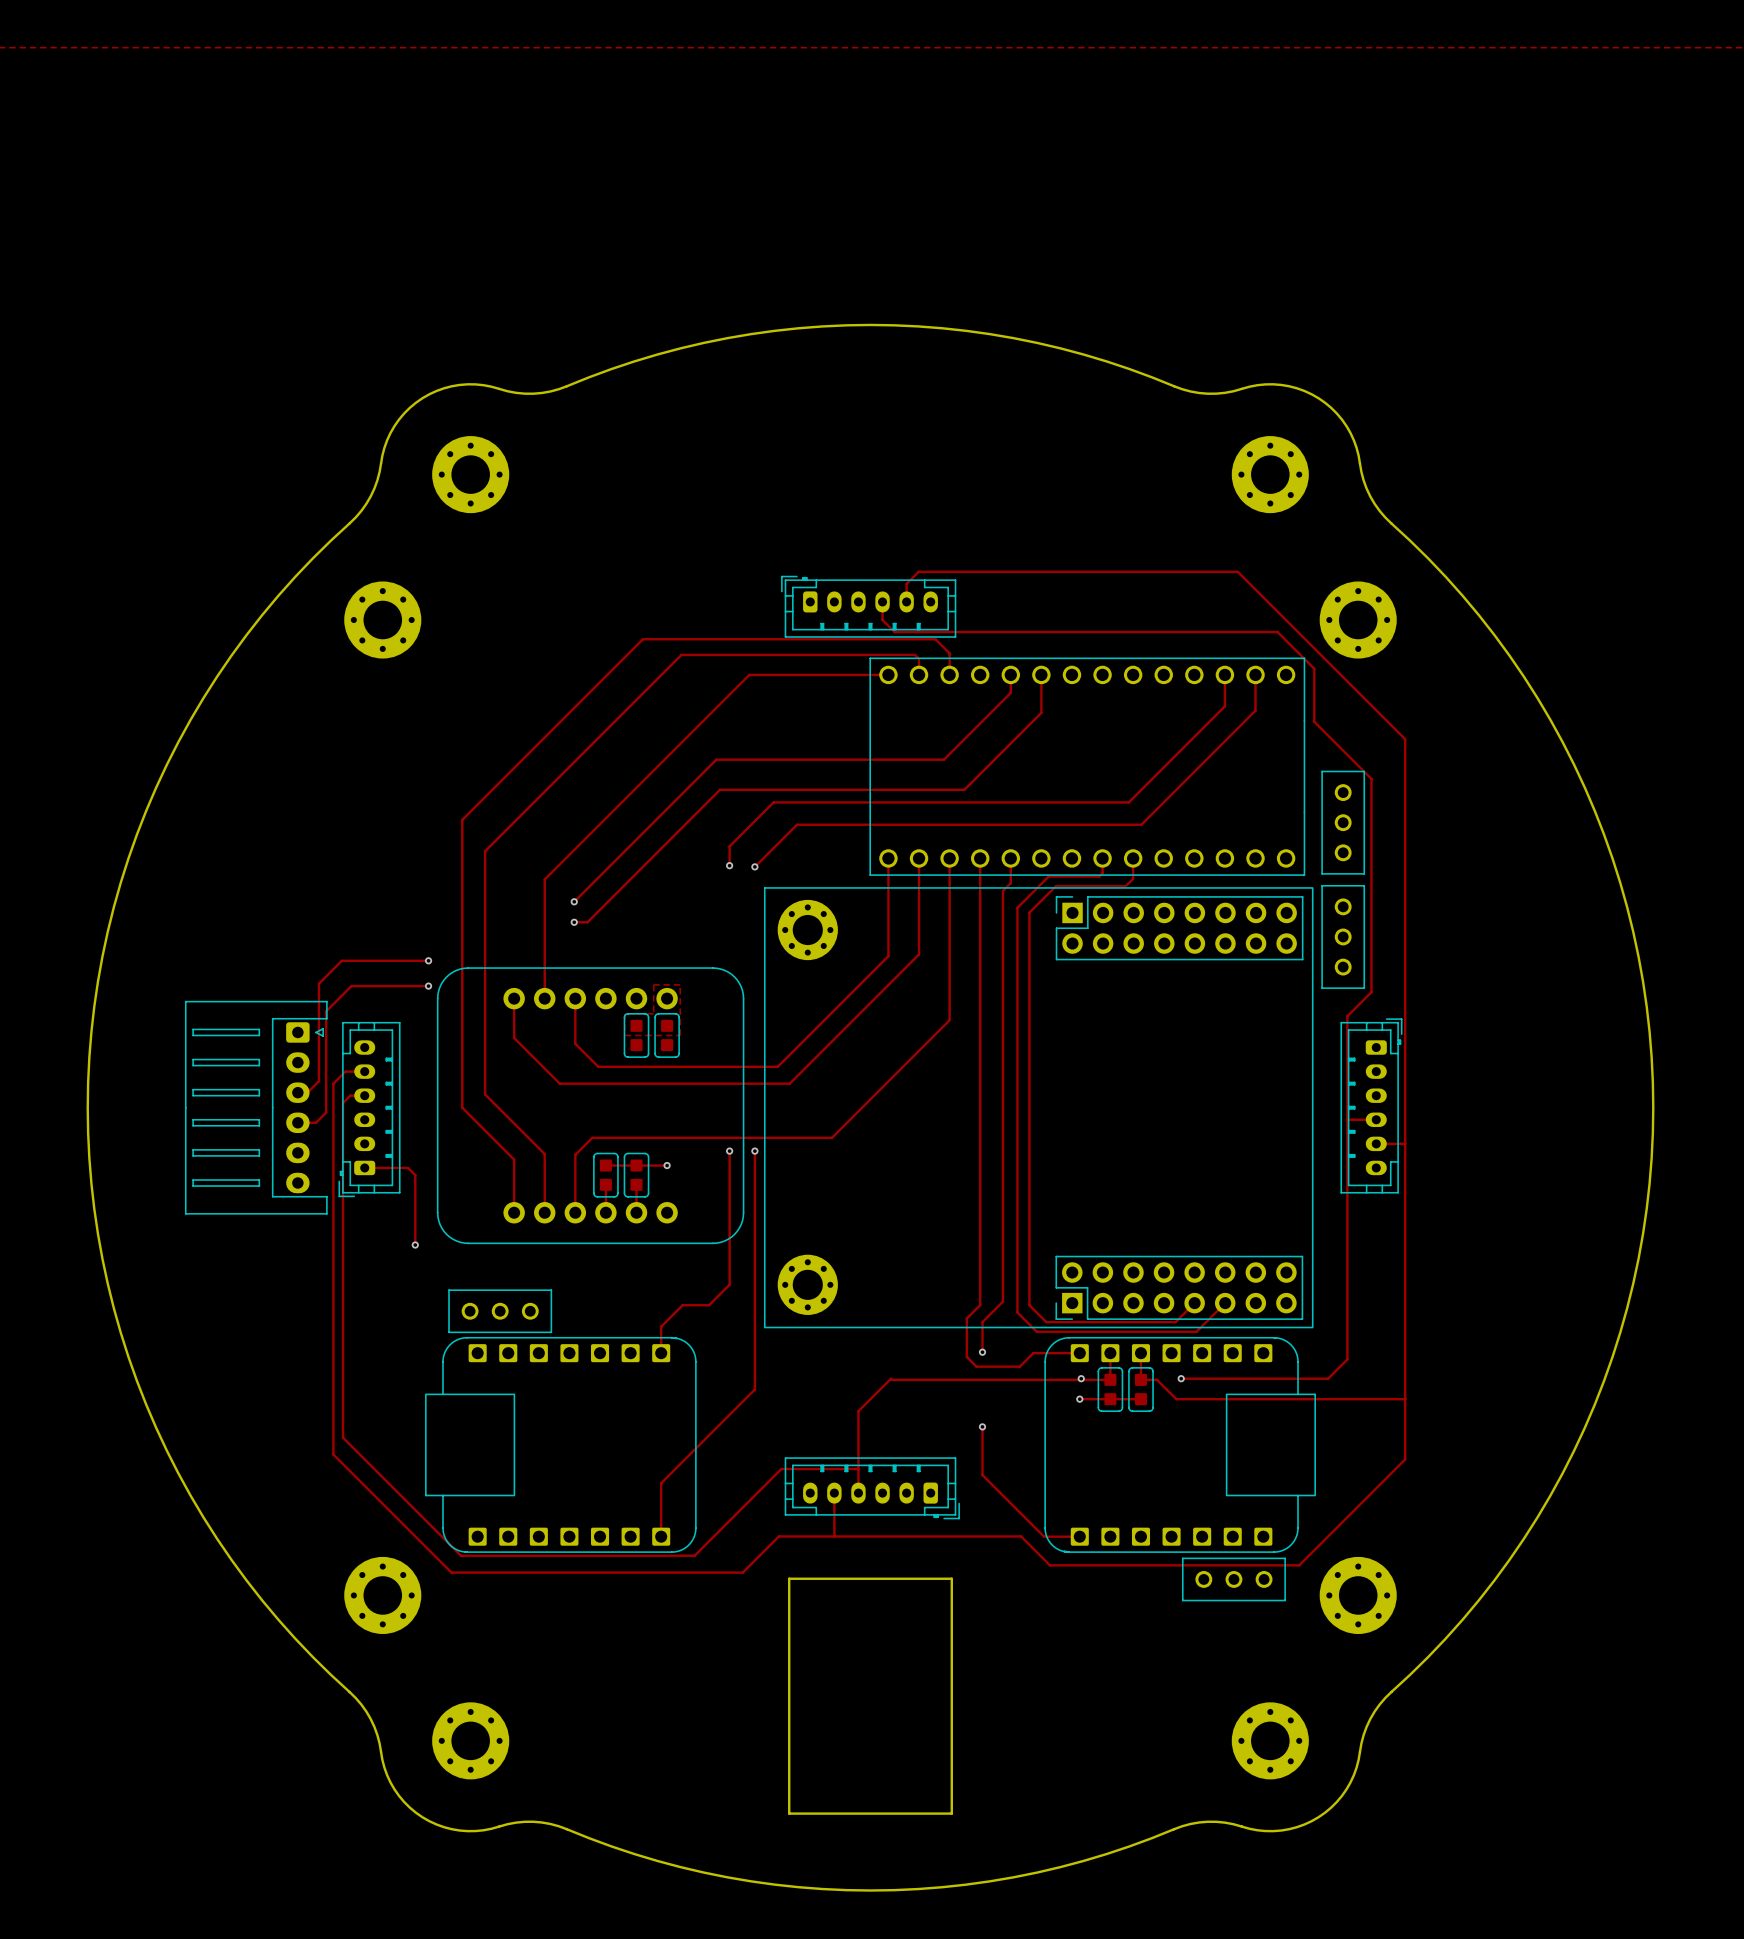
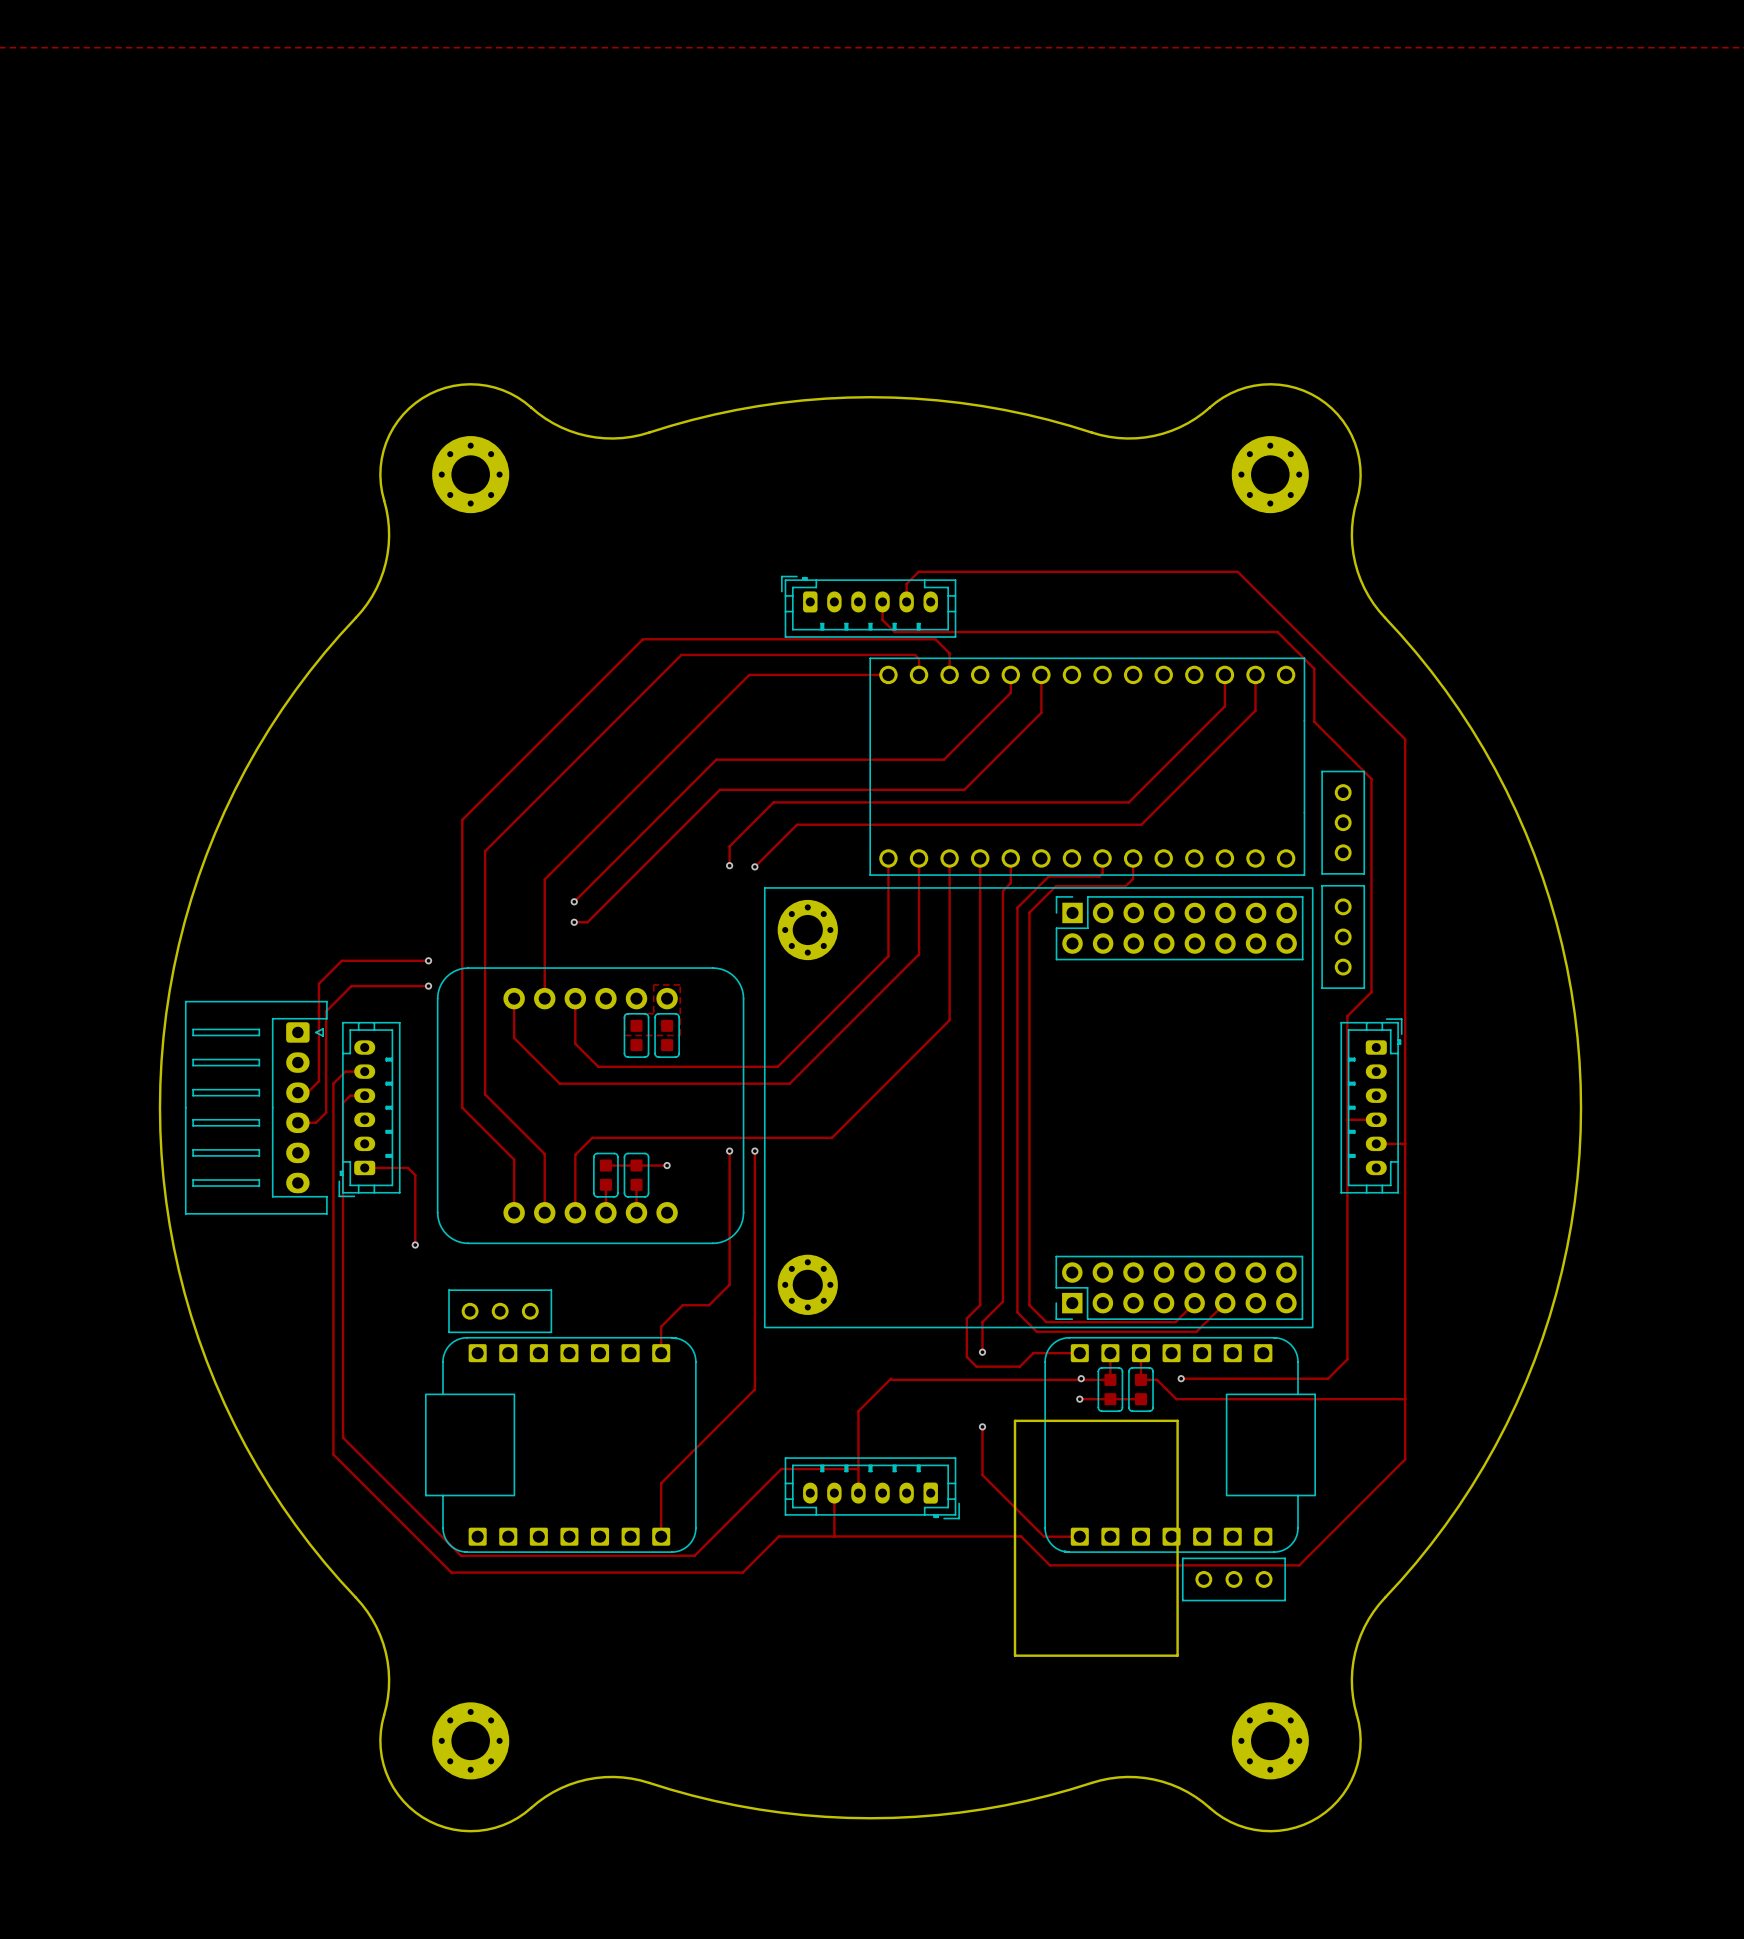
board edge: (566, 386) (550, 391) (533, 393) (515, 392) (475, 384) (451, 386) (429, 394) (404, 413) (387, 440) (377, 480) (366, 503) (355, 517) (312, 558) (278, 595) (246, 635) (203, 697) (166, 764) (136, 834) (120, 882) (107, 931) (94, 1006) (88, 1082) (89, 1158) (97, 1234) (113, 1308) (136, 1380) (156, 1427) (178, 1473) (217, 1538) (262, 1600) (295, 1638) (355, 1698) (366, 1711) (377, 1735) (387, 1775) (399, 1795) (415, 1812) (444, 1827) (475, 1831) (515, 1822) (541, 1822) (558, 1826) (634, 1854) (703, 1872) (798, 1887) (870, 1890) (966, 1884) (1037, 1872) (1106, 1854) (1182, 1826) (1199, 1822) (1225, 1822) (1257, 1830) (1273, 1831) (1289, 1829) (1311, 1821) (1331, 1807) (1346, 1789) (1356, 1767) (1366, 1726) (1379, 1704) (1462, 1619) (1494, 1580) (1537, 1517) (1574, 1450) (1594, 1404) (1620, 1332) (1633, 1283) (1646, 1208) (1652, 1133) (1652, 1082) (1646, 1006) (1633, 931) (1612, 858) (1594, 810) (1562, 742) (1523, 676) (1478, 615) (1445, 576) (1385, 517) (1374, 503) (1363, 480) (1353, 440) (1342, 419) (1325, 402) (1304, 390) (1281, 384) (1265, 384) (1225, 392) (1199, 392) (1182, 389) (1106, 361) (1037, 342) (942, 328) (870, 324) (798, 328) (703, 342) (634, 361) (566, 386) -> (531, 407) (510, 393) (494, 387) (470, 384) (453, 385) (429, 394) (415, 403) (403, 414) (393, 427) (386, 442) (380, 467) (380, 483) (387, 518) (389, 536) (385, 562) (380, 580) (361, 611) (324, 652) (282, 709) (245, 769) (224, 811) (206, 854) (184, 921) (173, 967) (163, 1037) (159, 1107) (163, 1178) (173, 1247) (191, 1316) (215, 1382) (234, 1425) (257, 1466) (295, 1525) (324, 1562) (361, 1604) (380, 1635) (385, 1652) (389, 1679) (387, 1697) (380, 1731) (380, 1748) (386, 1772) (393, 1787) (409, 1807) (429, 1821) (445, 1827) (470, 1831) (494, 1827) (510, 1821) (545, 1796) (569, 1784) (586, 1779) (613, 1776) (640, 1780) (692, 1795) (758, 1809) (803, 1815) (870, 1818) (915, 1816) (982, 1809) (1048, 1795) (1100, 1780) (1136, 1777) (1162, 1781) (1179, 1788) (1195, 1796) (1223, 1817) (1246, 1827) (1262, 1830) (1279, 1830) (1295, 1827) (1311, 1821) (1325, 1812) (1342, 1794) (1351, 1780) (1357, 1764) (1360, 1739) (1353, 1697) (1352, 1670) (1357, 1643) (1364, 1627) (1379, 1604) (1431, 1544) (1471, 1486) (1506, 1425) (1534, 1360) (1549, 1316) (1567, 1247) (1574, 1201) (1580, 1131) (1579, 1060) (1571, 990) (1556, 921) (1542, 876) (1525, 833) (1506, 790) (1471, 728) (1431, 671) (1373, 603) (1360, 580) (1355, 562) (1351, 536) (1353, 518) (1360, 483) (1360, 467) (1357, 450) (1347, 427) (1331, 408) (1318, 398) (1295, 387) (1270, 384) (1254, 385) (1238, 390) (1223, 397) (1195, 418) (1179, 427) (1162, 433) (1136, 438) (1100, 435) (1048, 419) (1004, 410) (915, 398) (848, 397) (780, 402) (714, 414) (640, 435) (613, 438) (586, 435) (569, 430) (545, 418) (531, 407)
part: (382, 620) -> none
part: (1358, 620) -> none
board edge: (789, 1578) (951, 1578) (951, 1813) (789, 1813) (789, 1578) -> (1015, 1420) (1177, 1420) (1177, 1655) (1015, 1655) (1015, 1420)
part: (382, 1595) -> none
part: (1358, 1595) -> none

